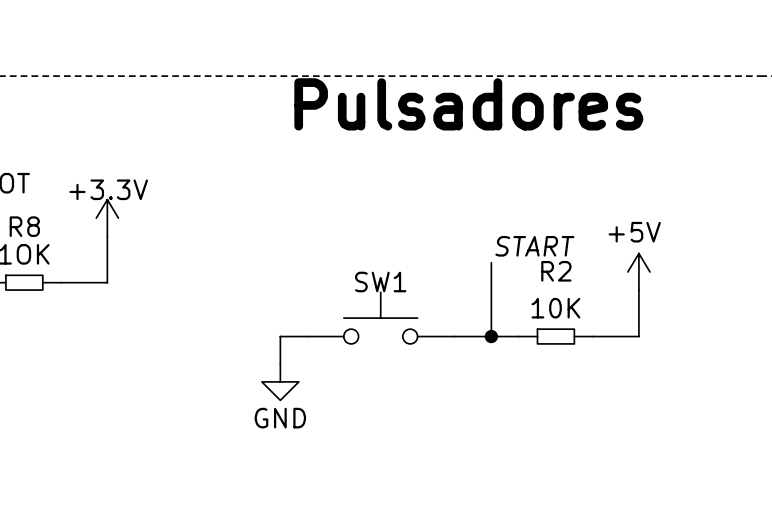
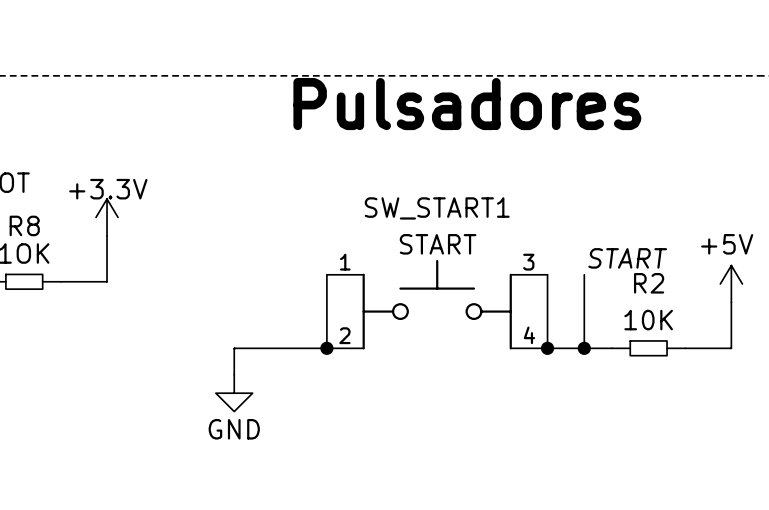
label position: START (534, 246) -> START (627, 258)
wire: (491, 262) (491, 336) -> (584, 274) (584, 348)
power symbol position: +5V (638, 271) -> +5V (731, 283)
wire: none -> (326, 274) (326, 348) (234, 348) (234, 374)
wire: none -> (547, 274) (547, 348) (611, 348)
wire: (638, 290) (638, 336) (592, 336) -> (731, 302) (731, 348) (685, 348)
SW_START1: none -> START (437, 304)
SW1: (380, 318) -> none
wire: (306, 336) (280, 336) (280, 363) -> none
wire: (454, 336) (519, 336) -> none
junction: (491, 336) -> none
R2 position: (555, 336) -> (648, 348)
junction: none -> (326, 348)
junction: none -> (547, 348)
junction: none -> (584, 348)
power symbol position: GND (280, 381) -> GND (234, 393)

